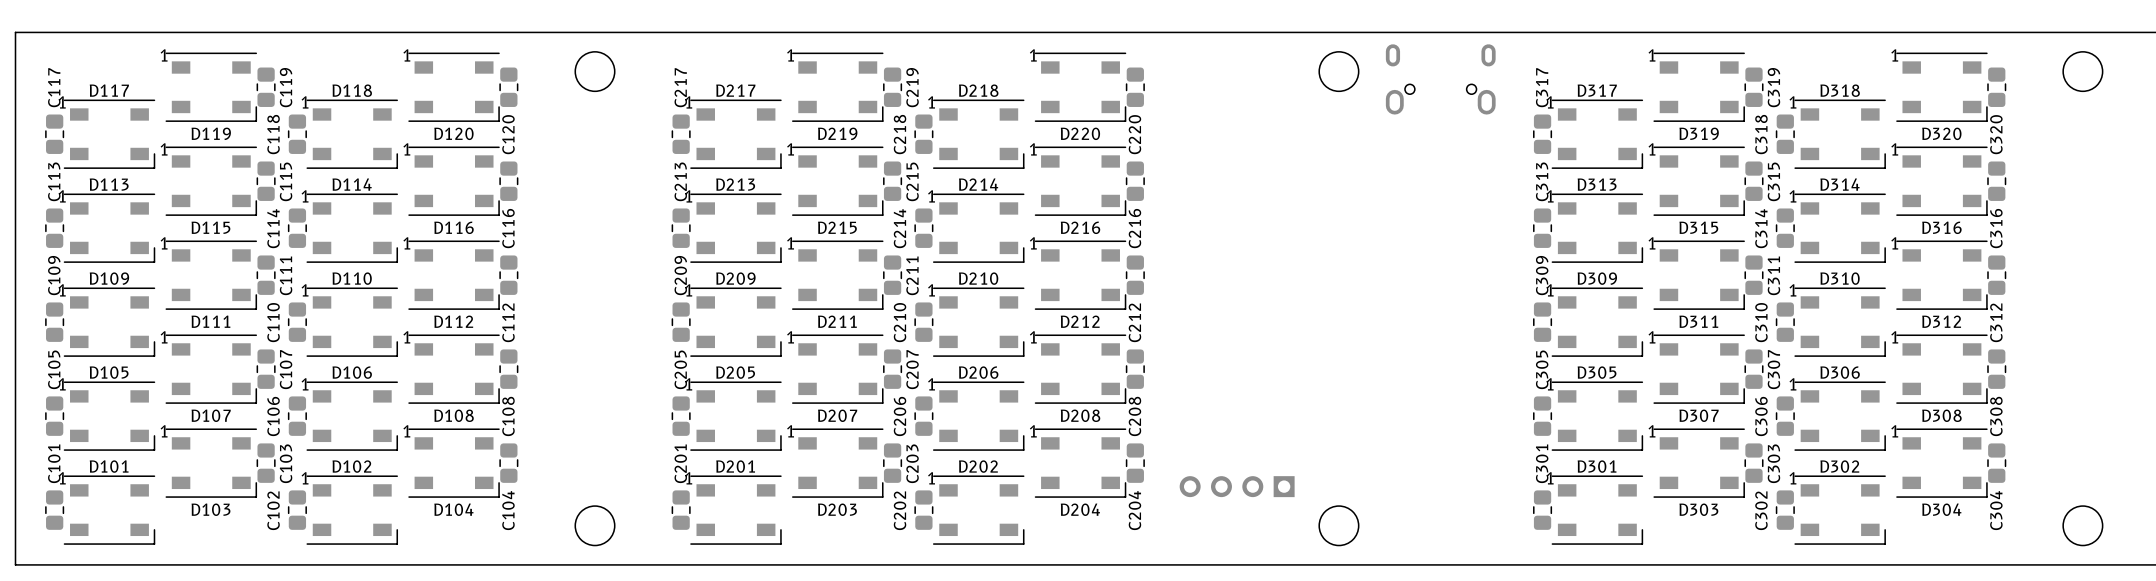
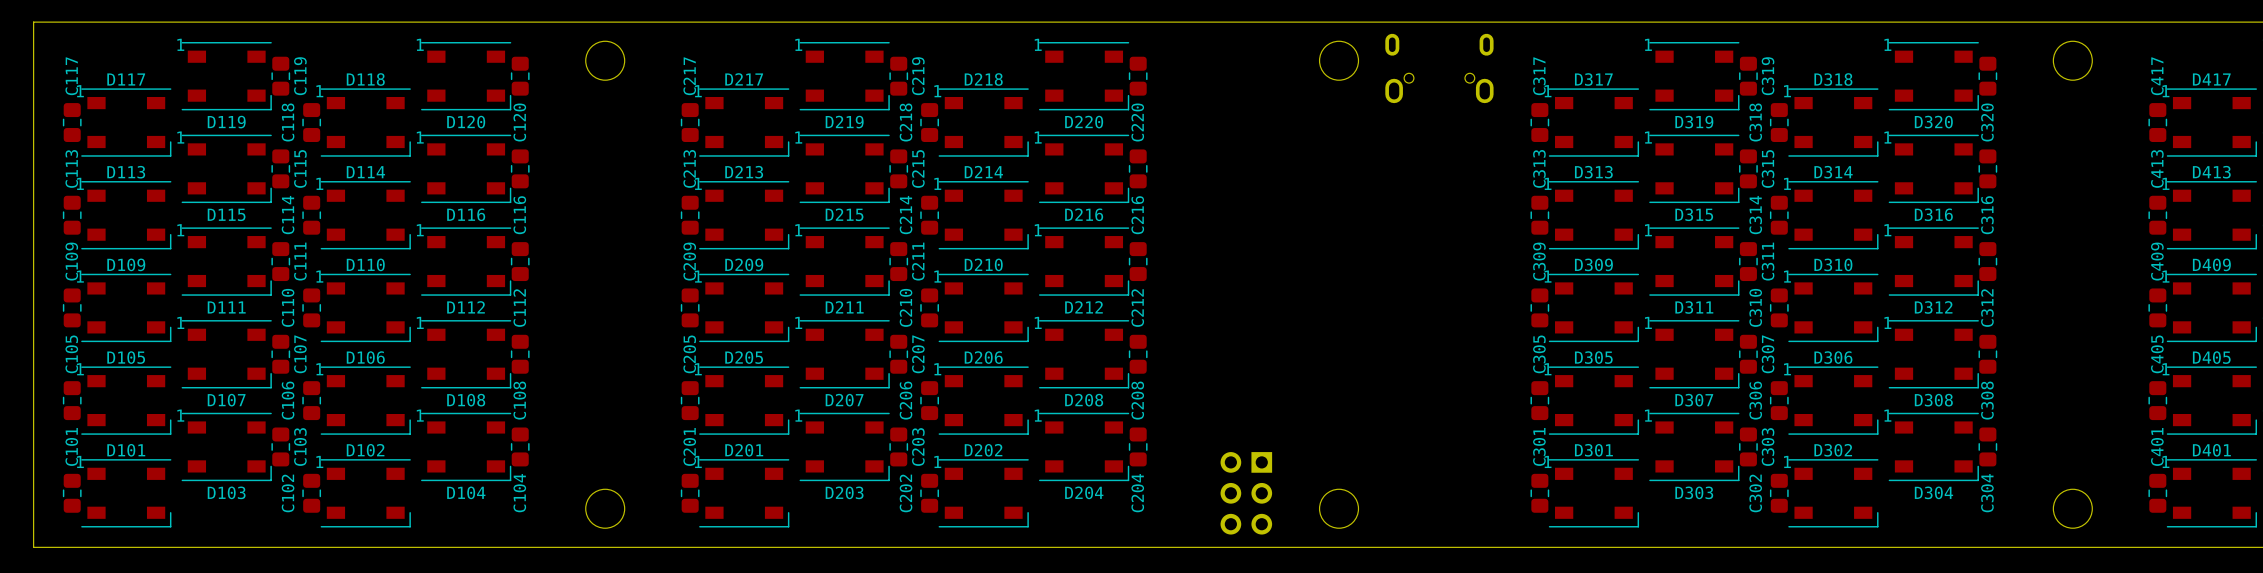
part: (1237, 486) -> none
part: none -> (1246, 493)

